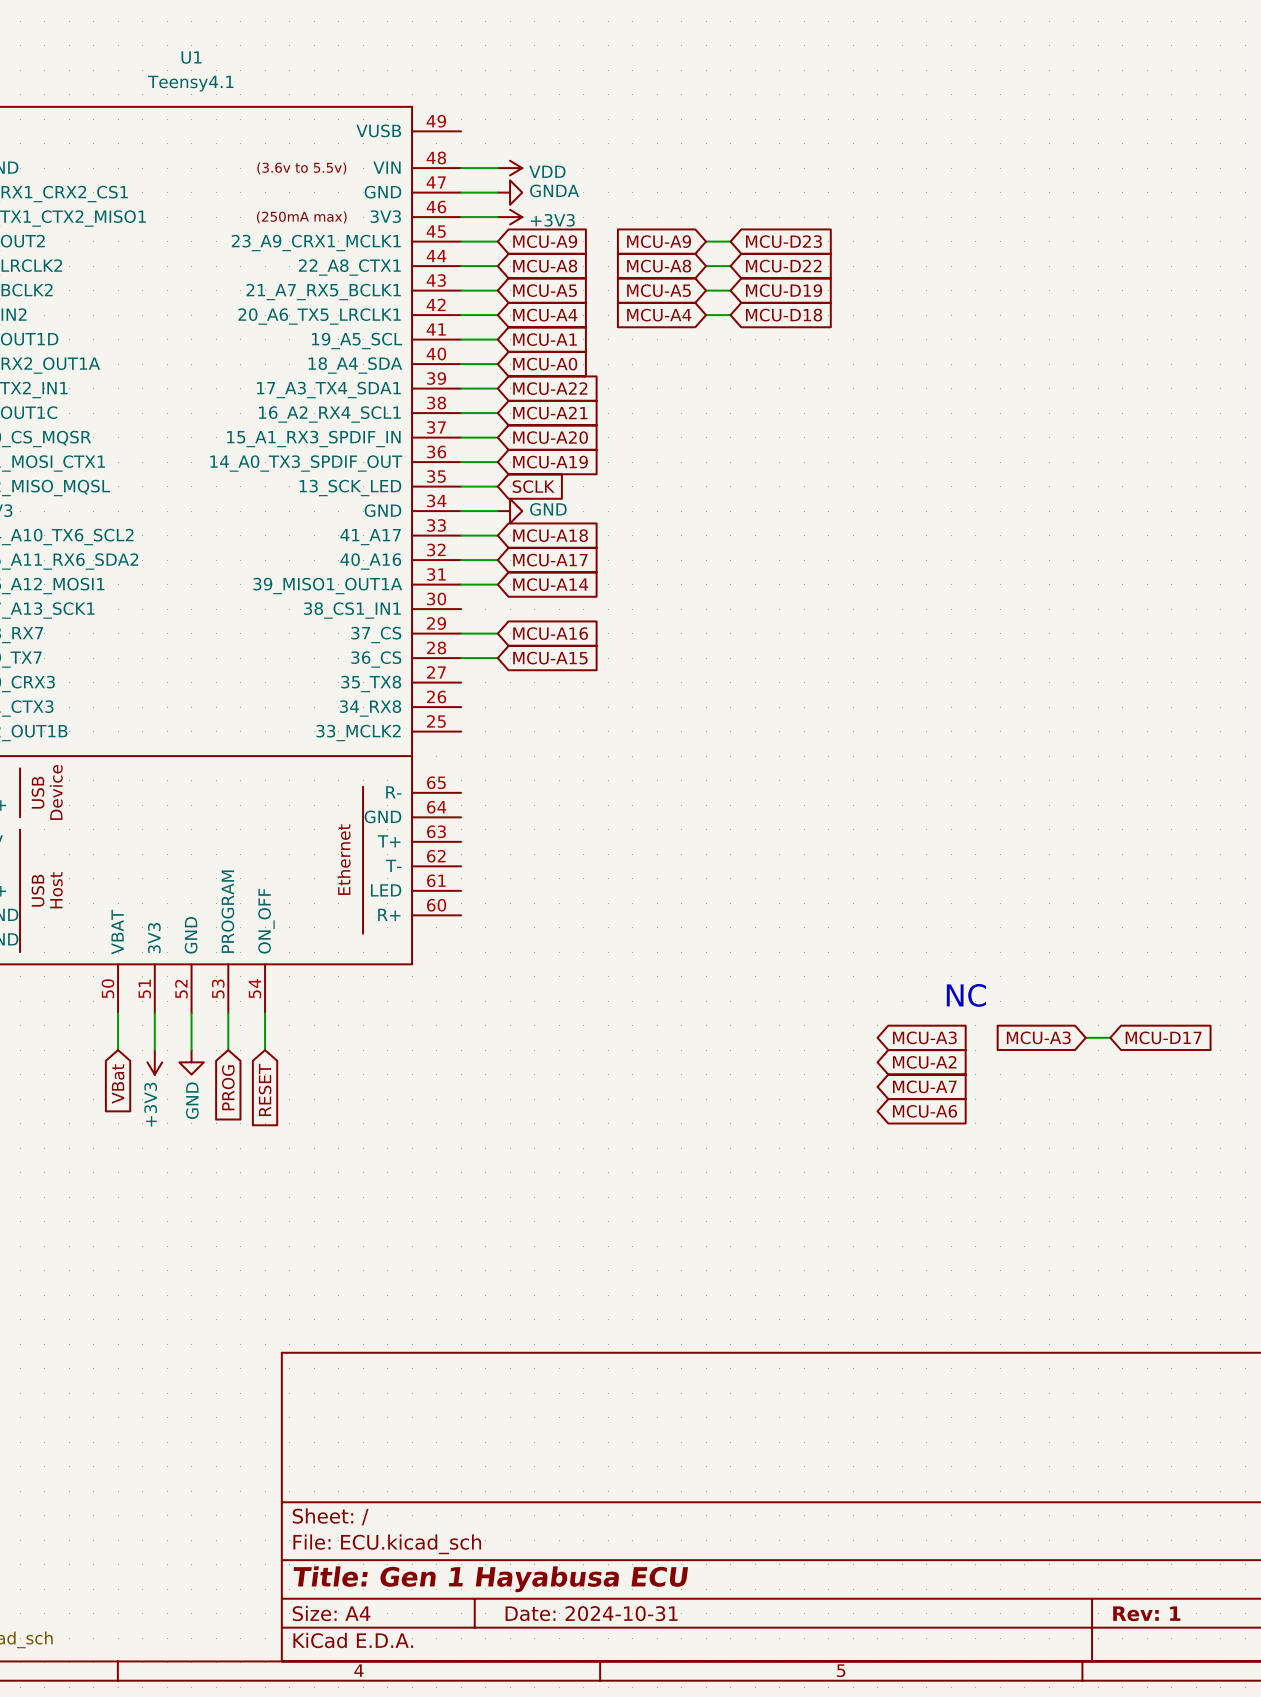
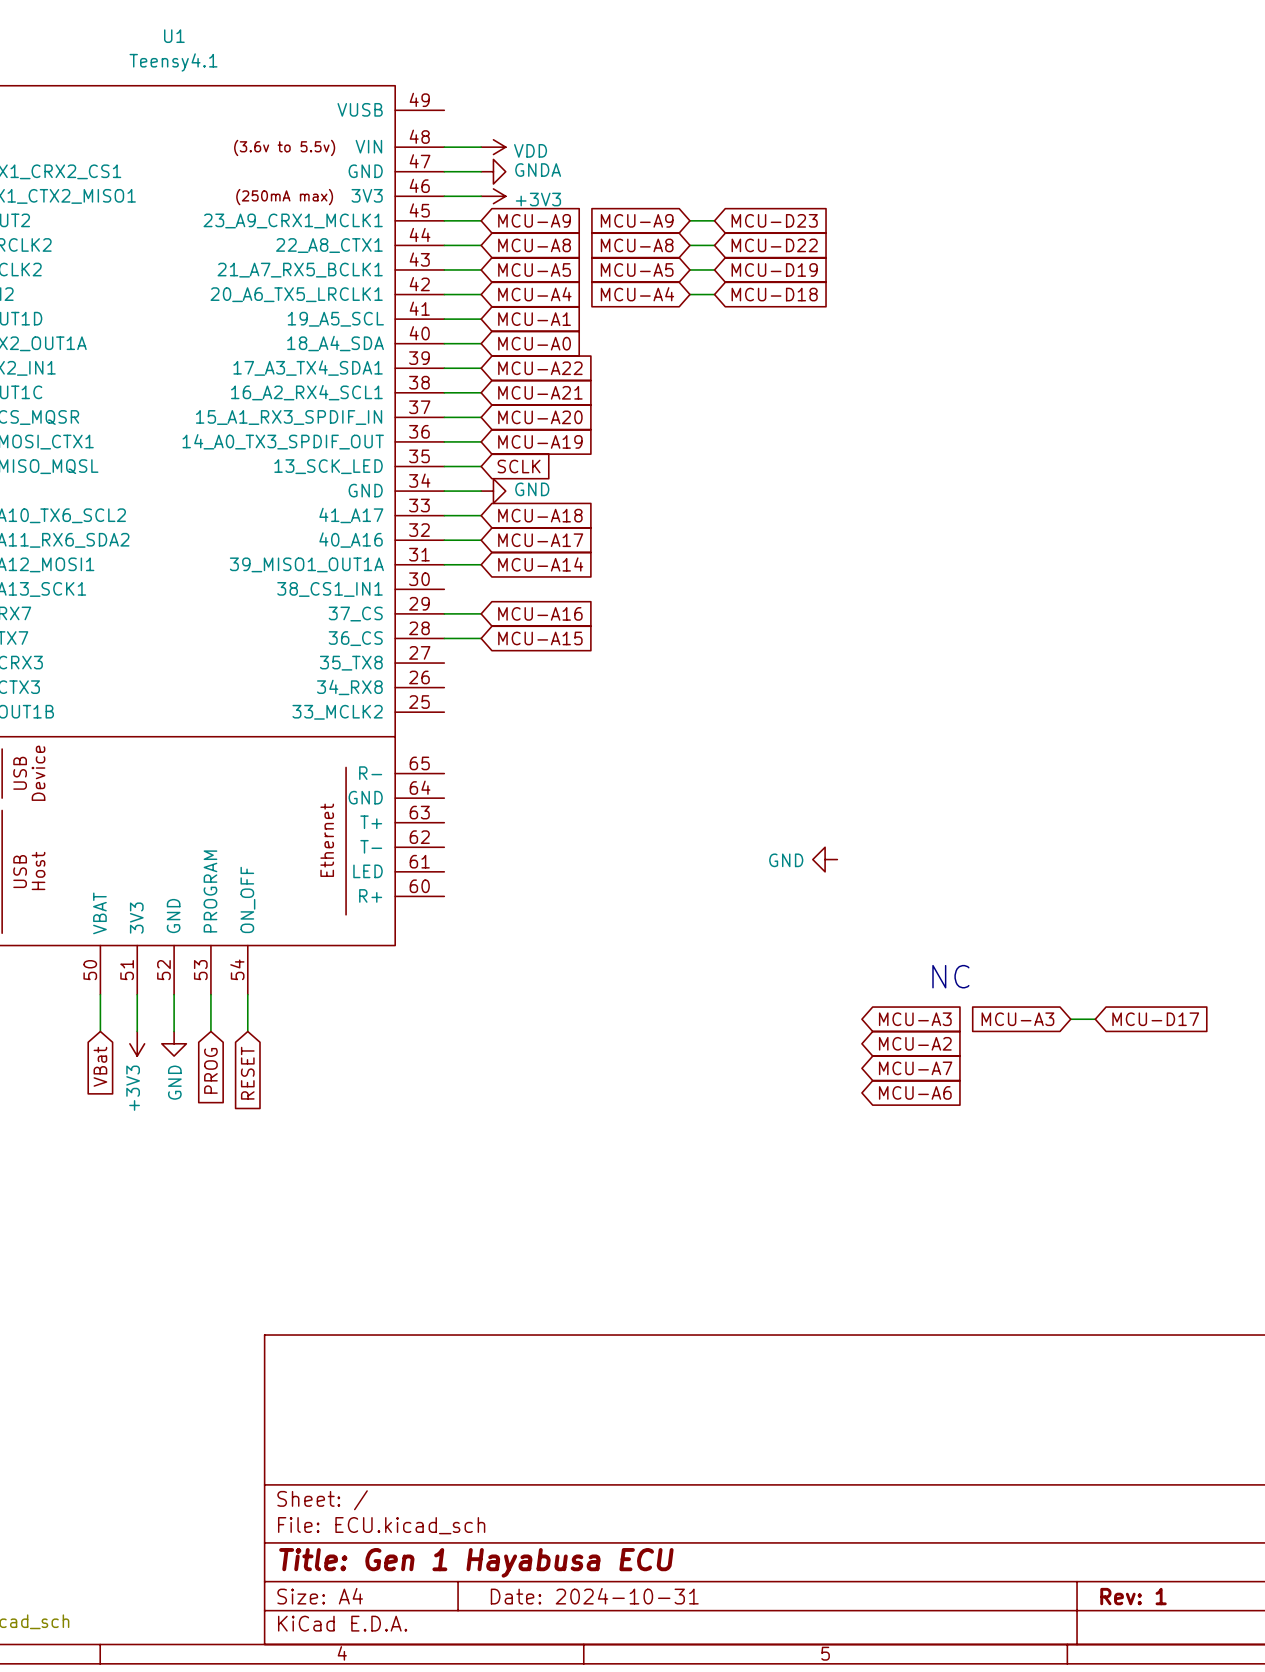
power symbol: none -> GND (825, 859)

